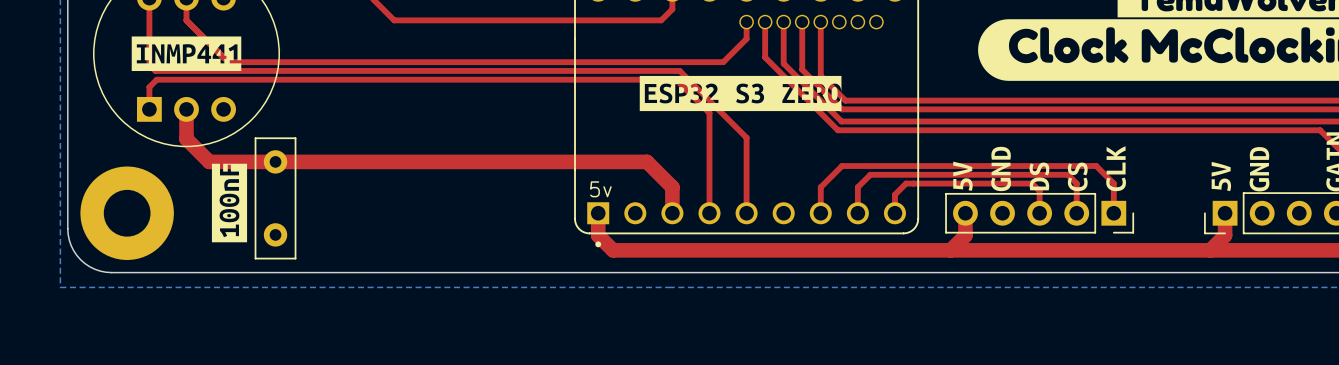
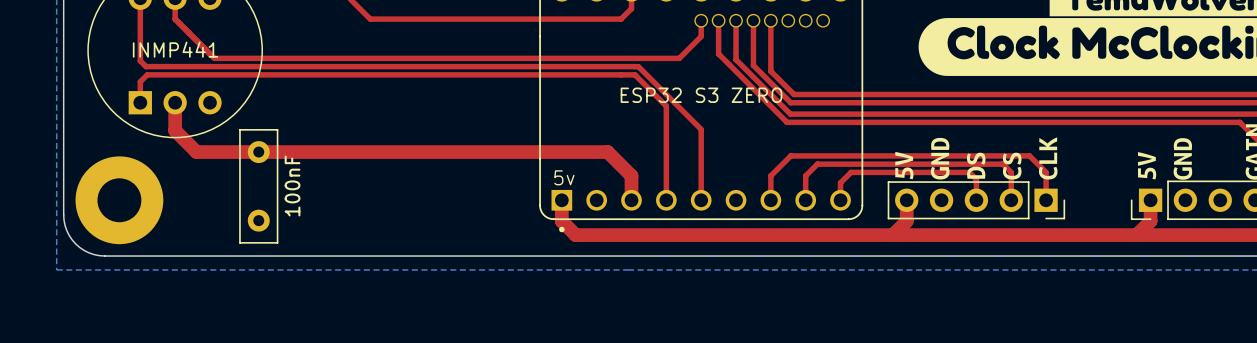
drawing: [131, 36, 242, 72] -> none
INMP441 name: none -> INMP441 (175, 49)
drawing: [639, 75, 842, 112] -> none
ESP32 S3 ZERO name: none -> ESP32 S3 ZERO (701, 95)
drawing: [211, 163, 248, 243] -> none
100nF name: none -> 100nF (292, 186)

